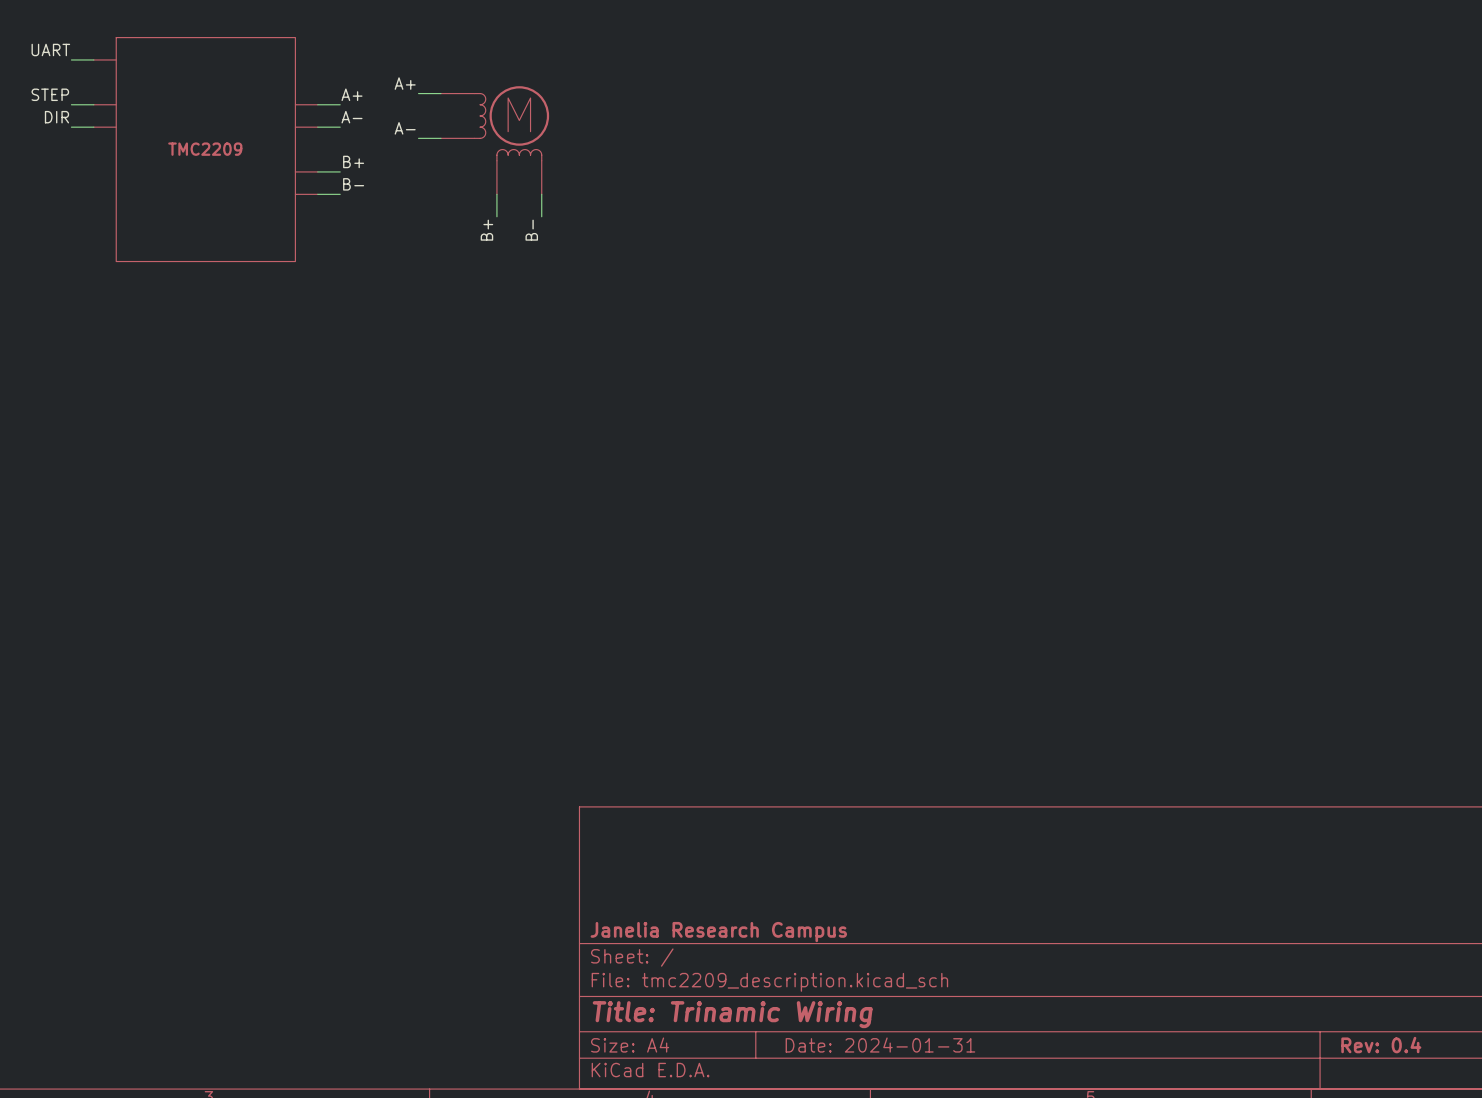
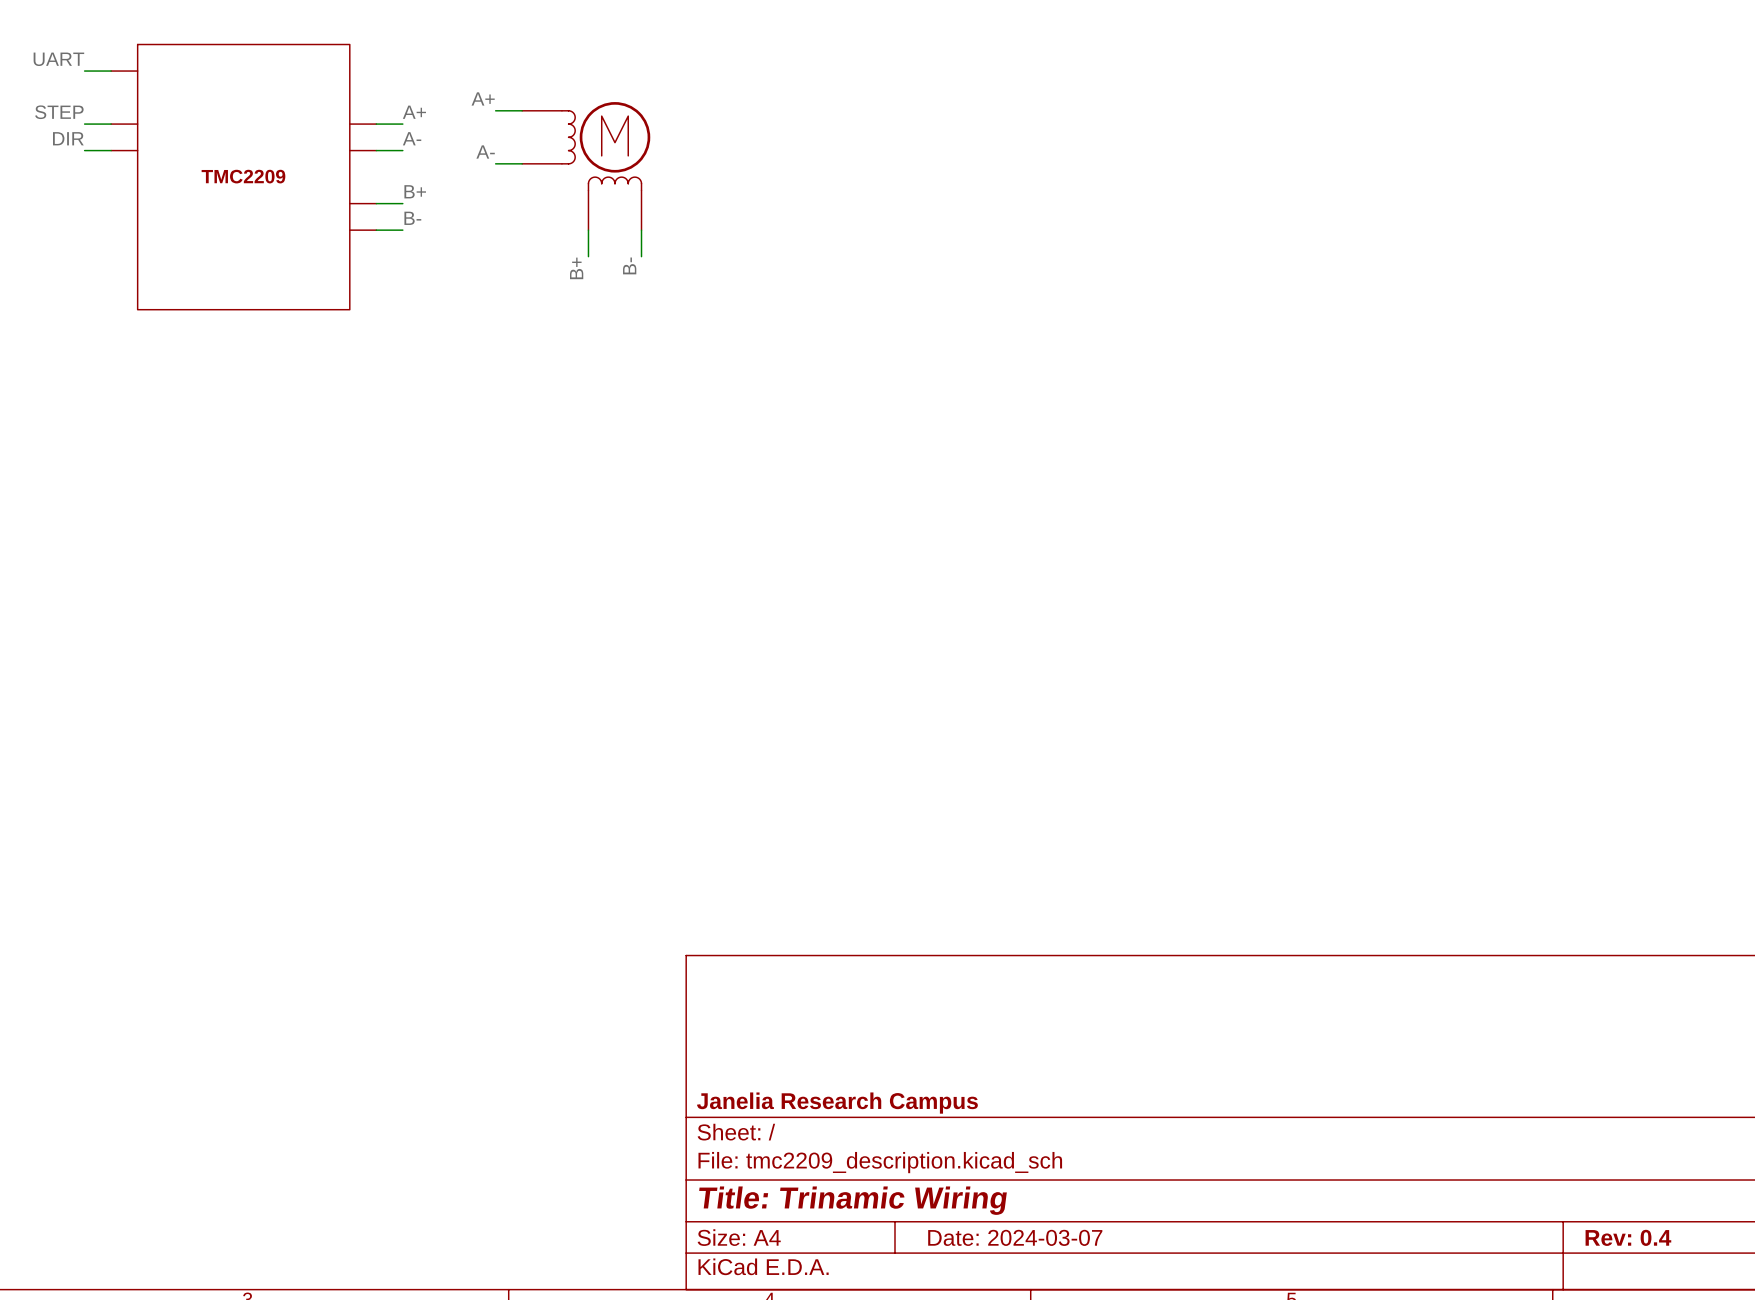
title block: Date: 2024-01-31 (880, 1045) -> Date: 2024-03-07 (1015, 1237)

